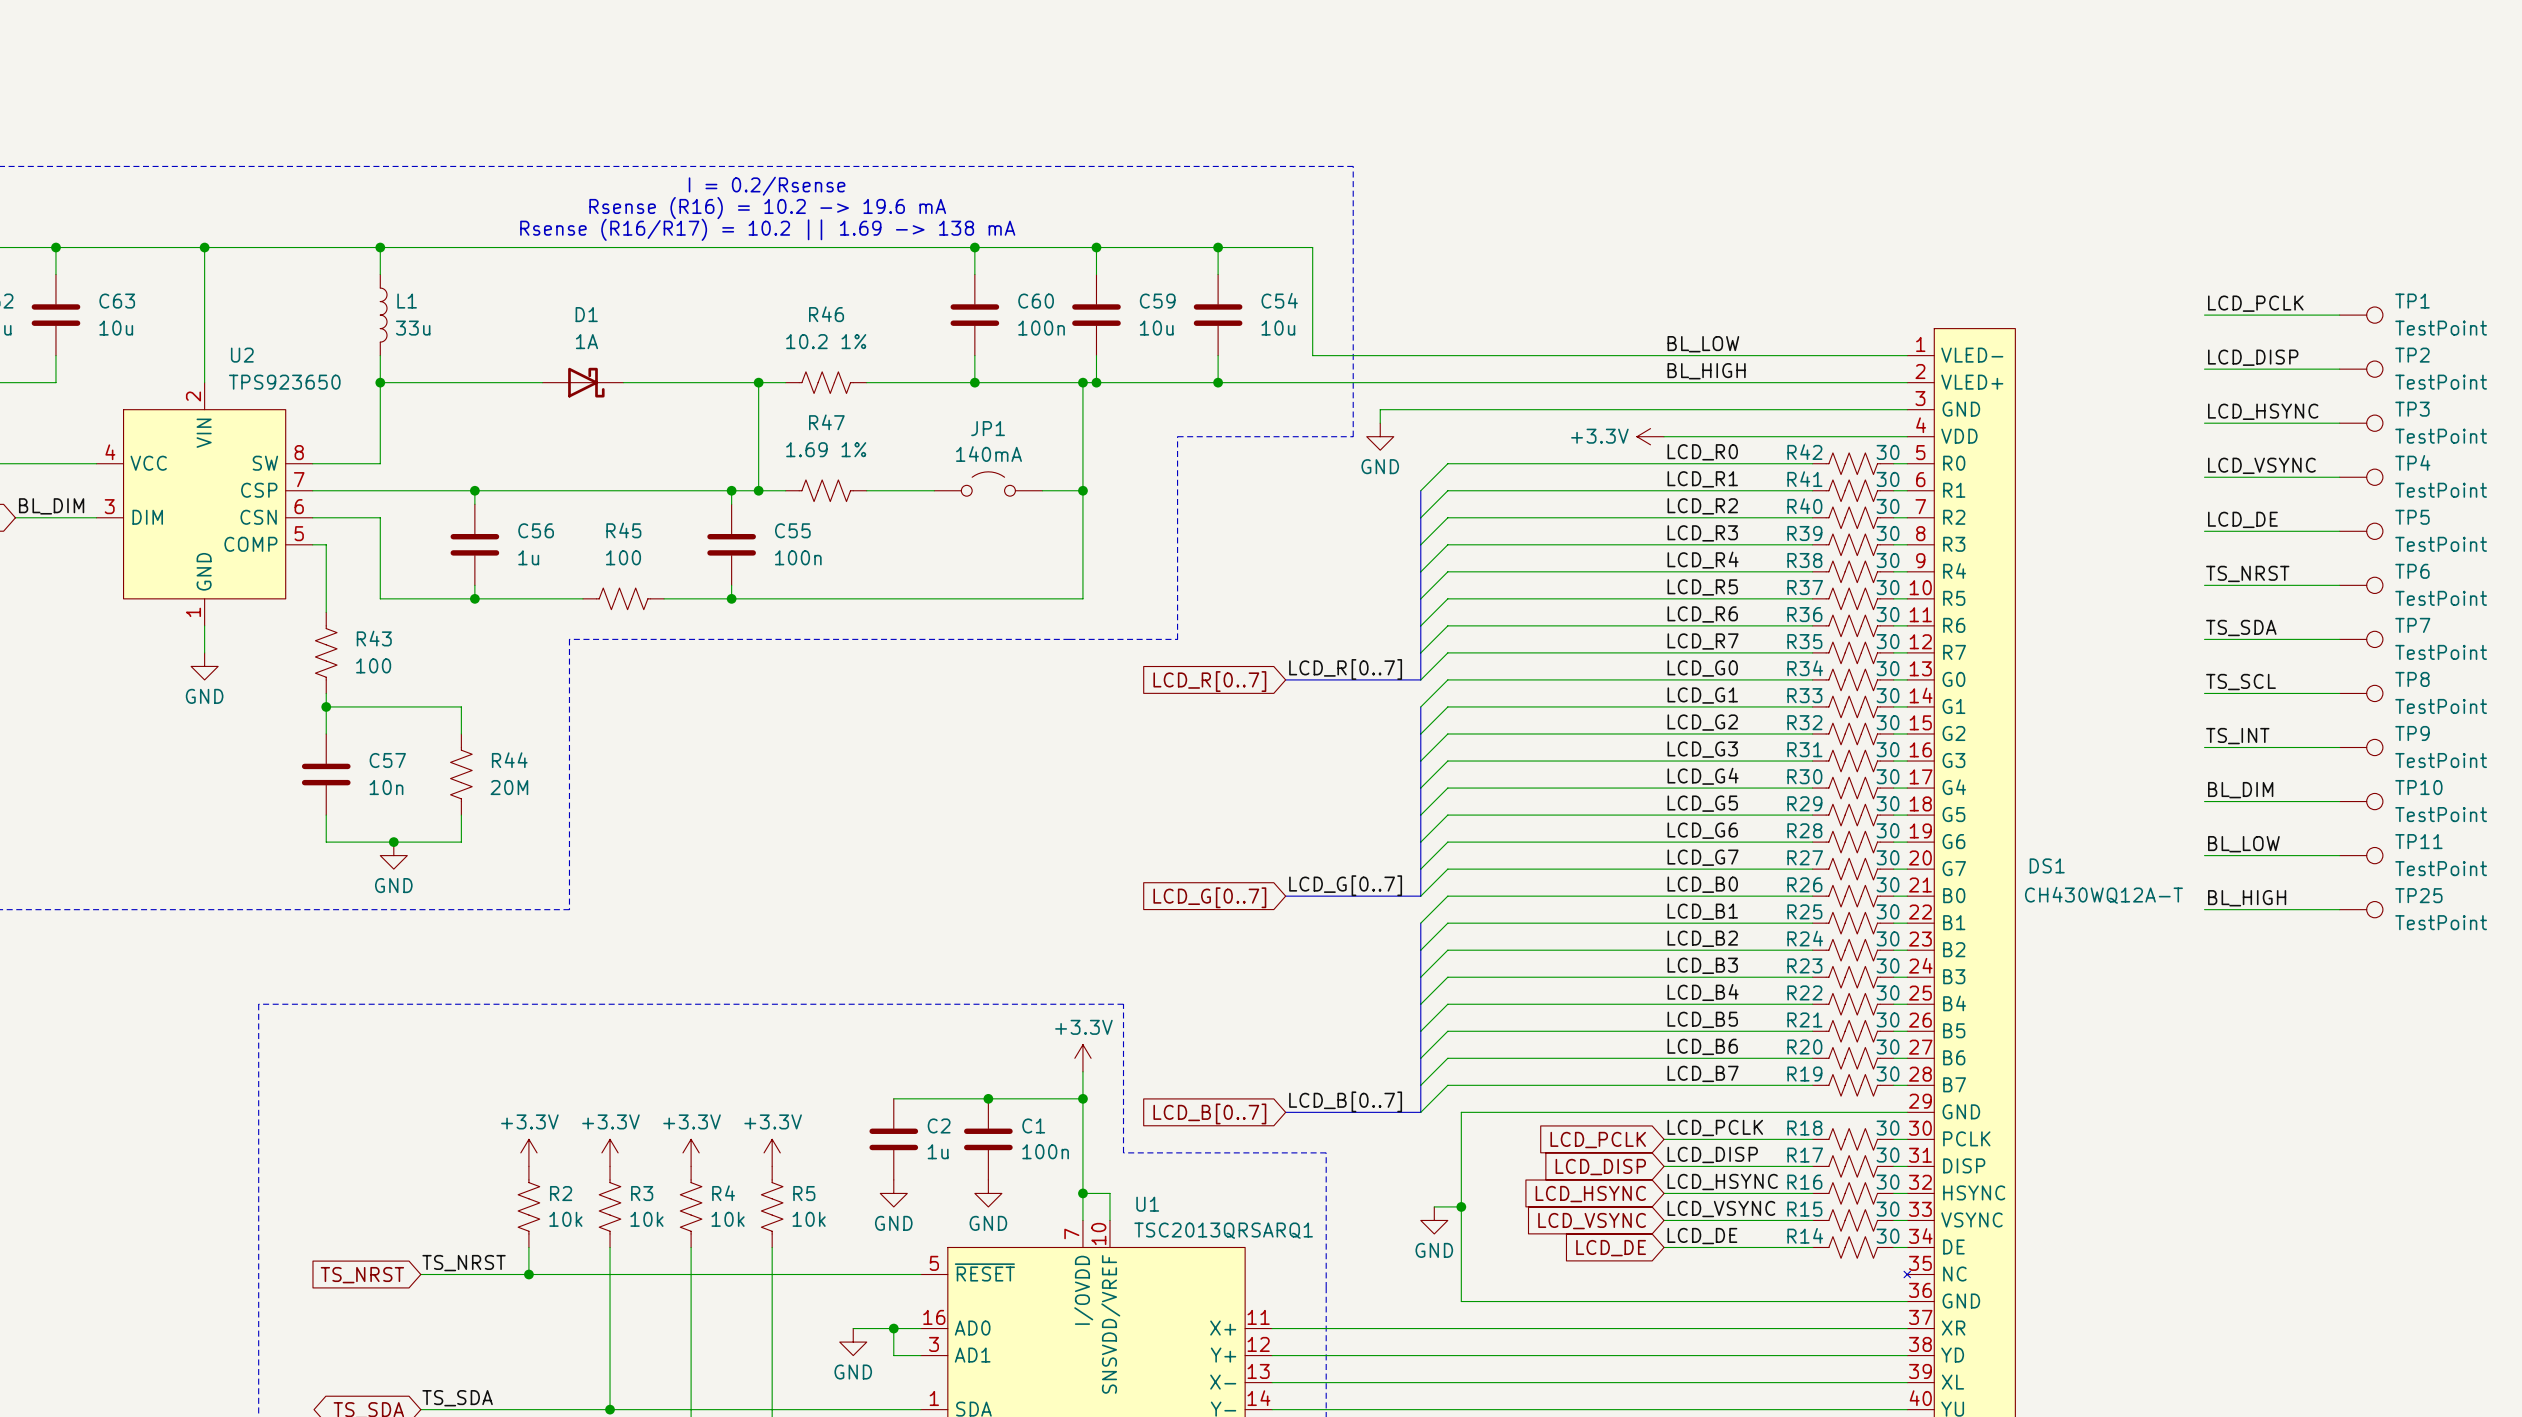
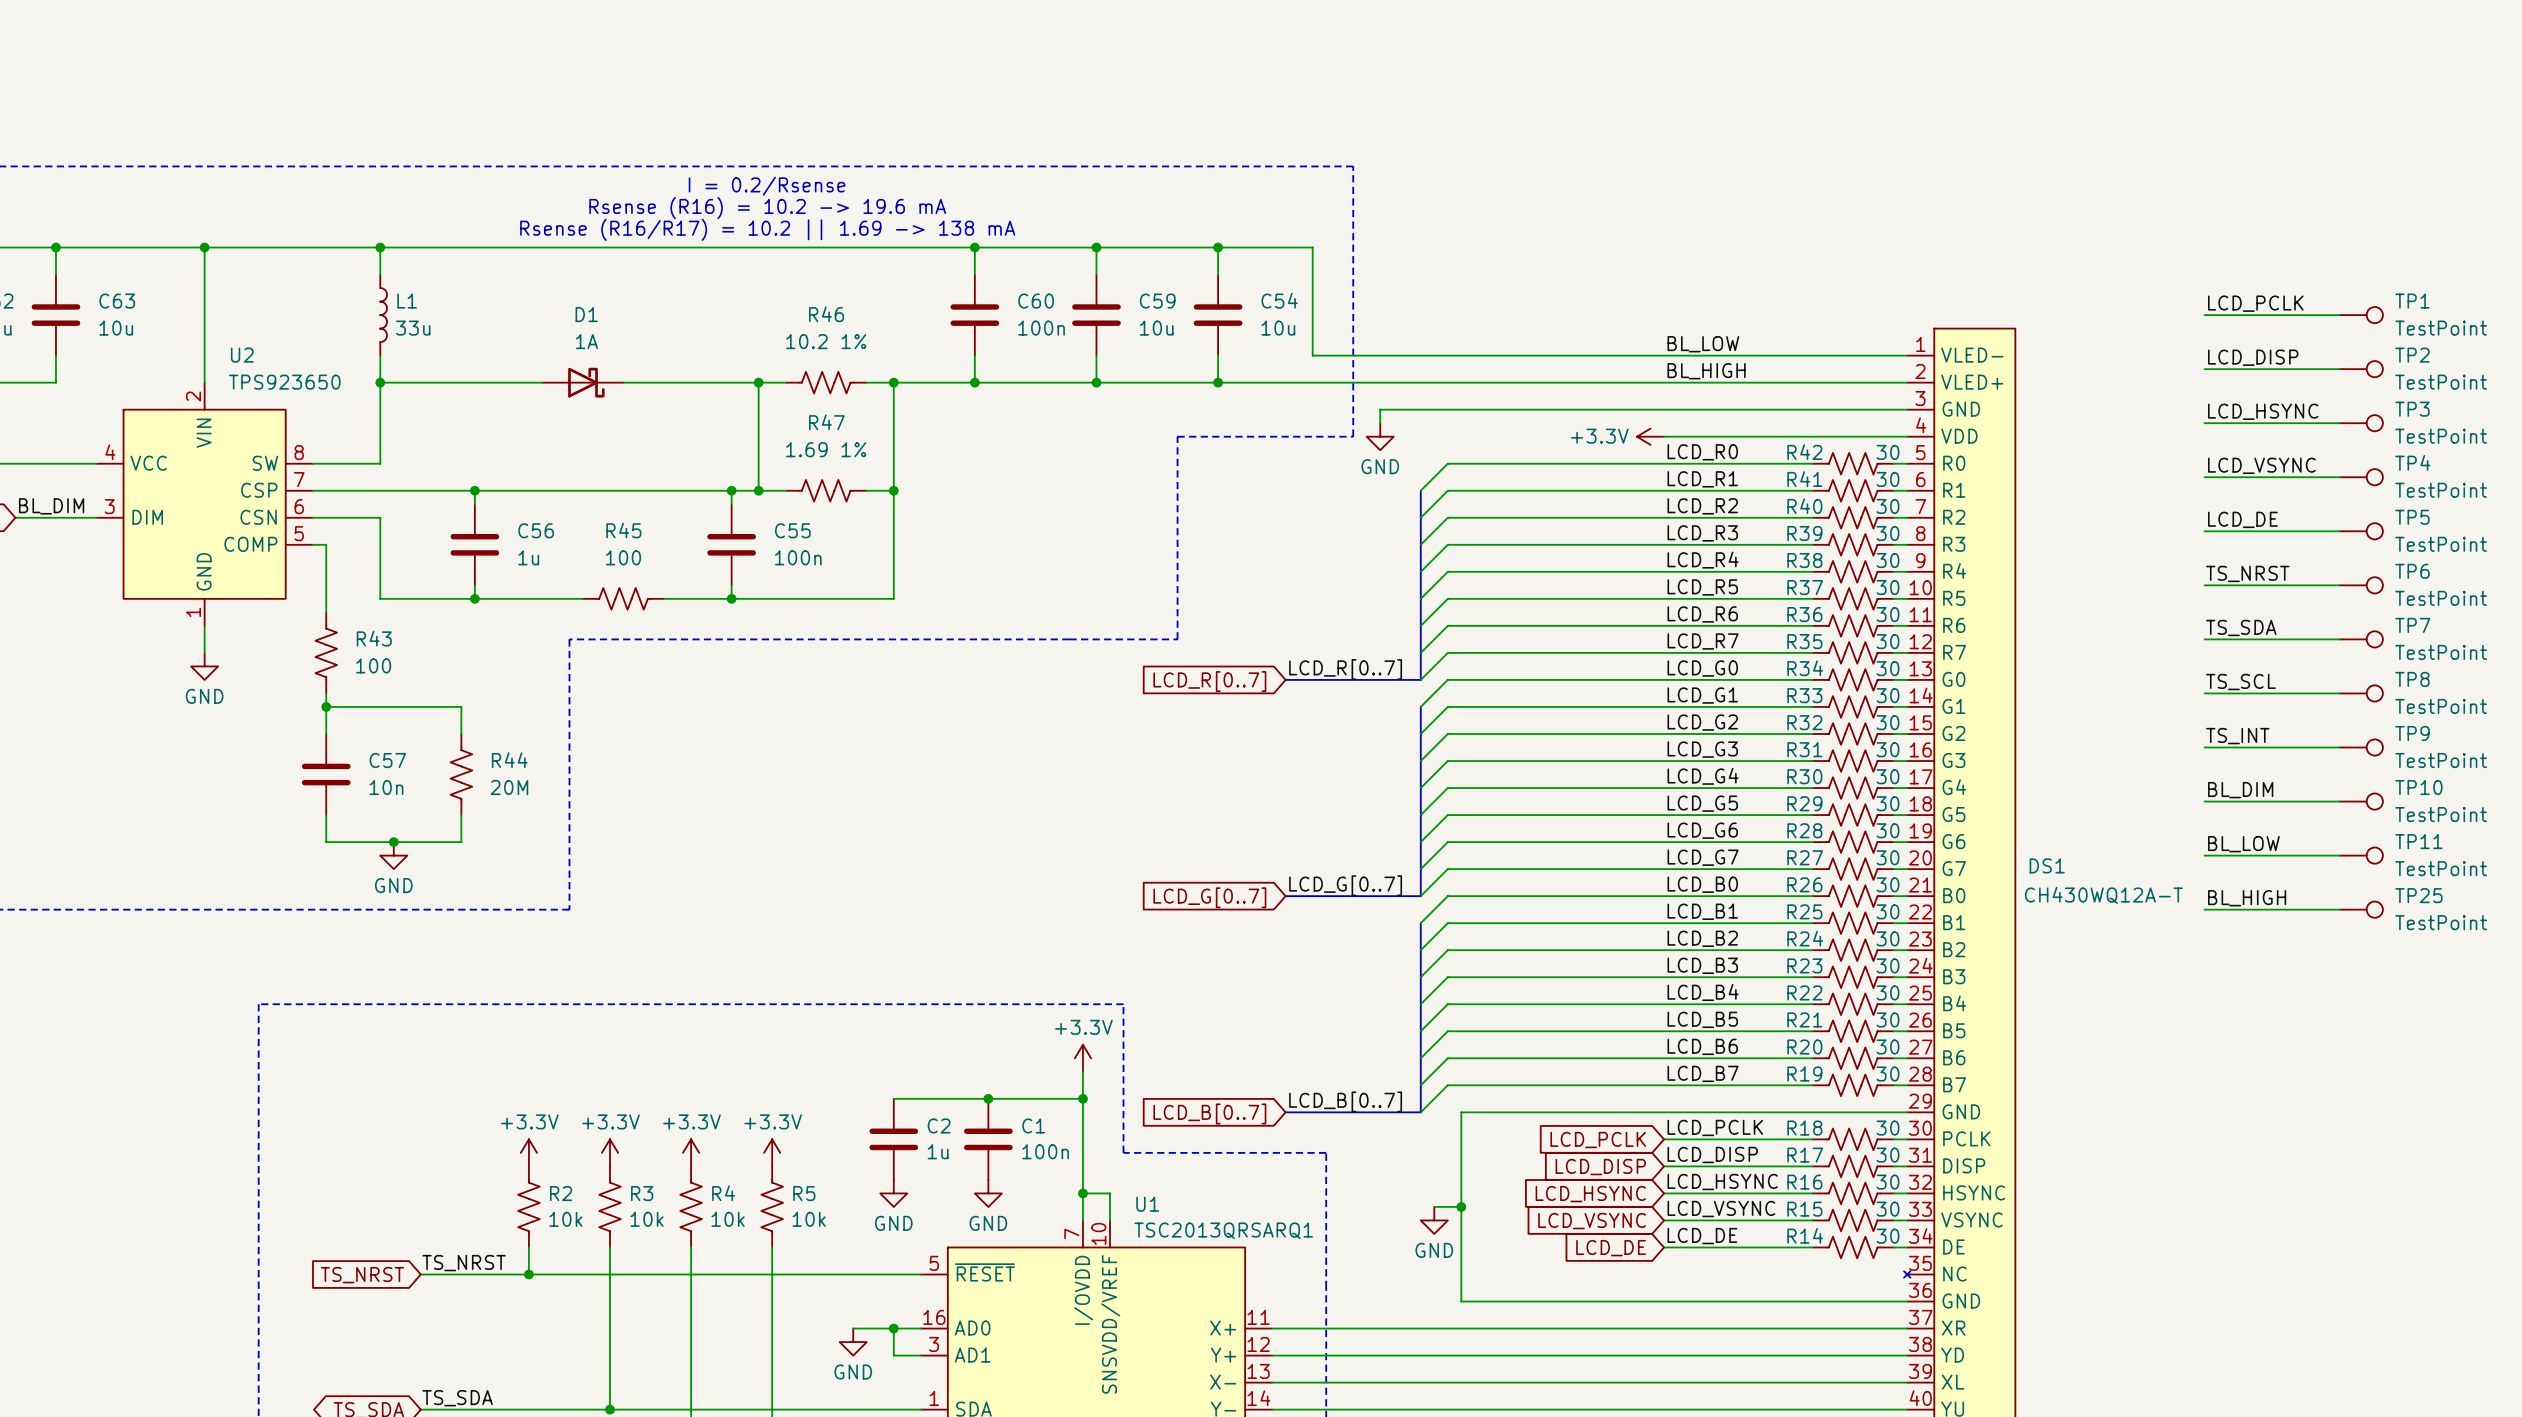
junction: none -> (893, 382)
wire: (1082, 382) (1082, 598) (893, 598) -> (893, 382) (893, 598)
junction: (1082, 382) -> none
JP1: 140mA (988, 484) -> none
wire: (893, 490) (934, 490) -> none
junction: none -> (893, 490)
wire: (1042, 490) (1082, 490) -> none
junction: (1082, 490) -> none

